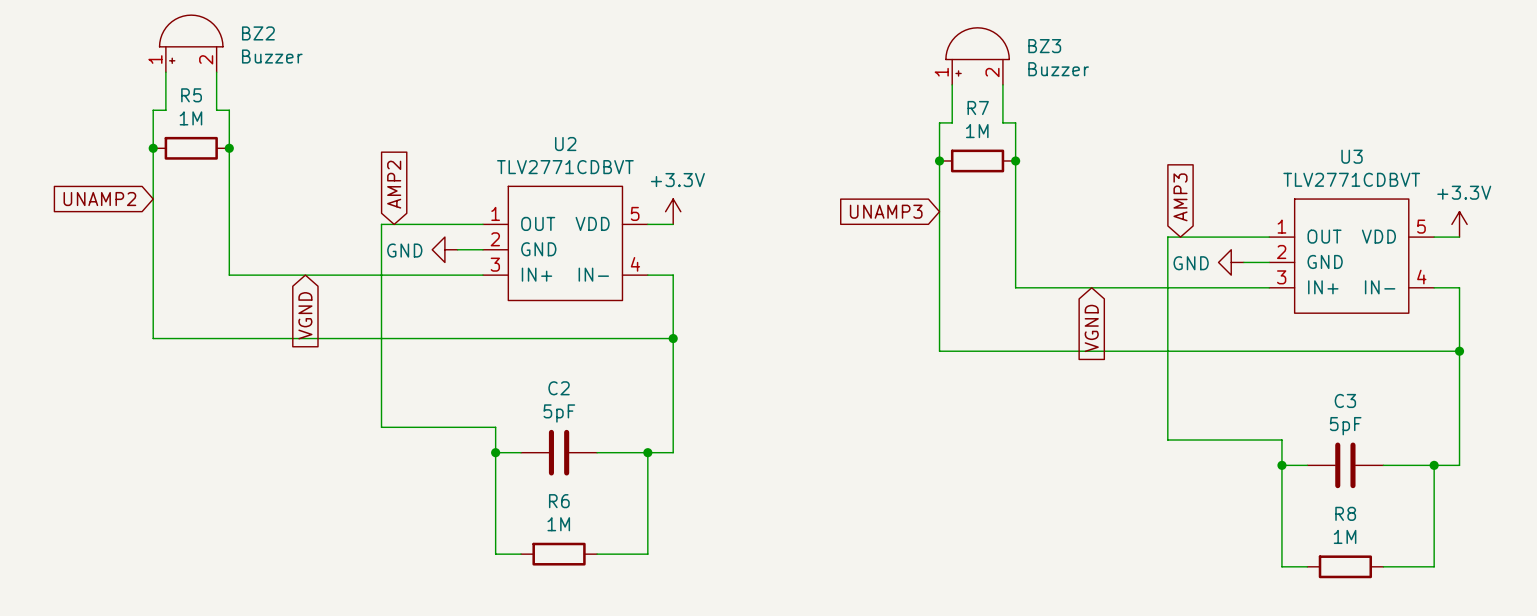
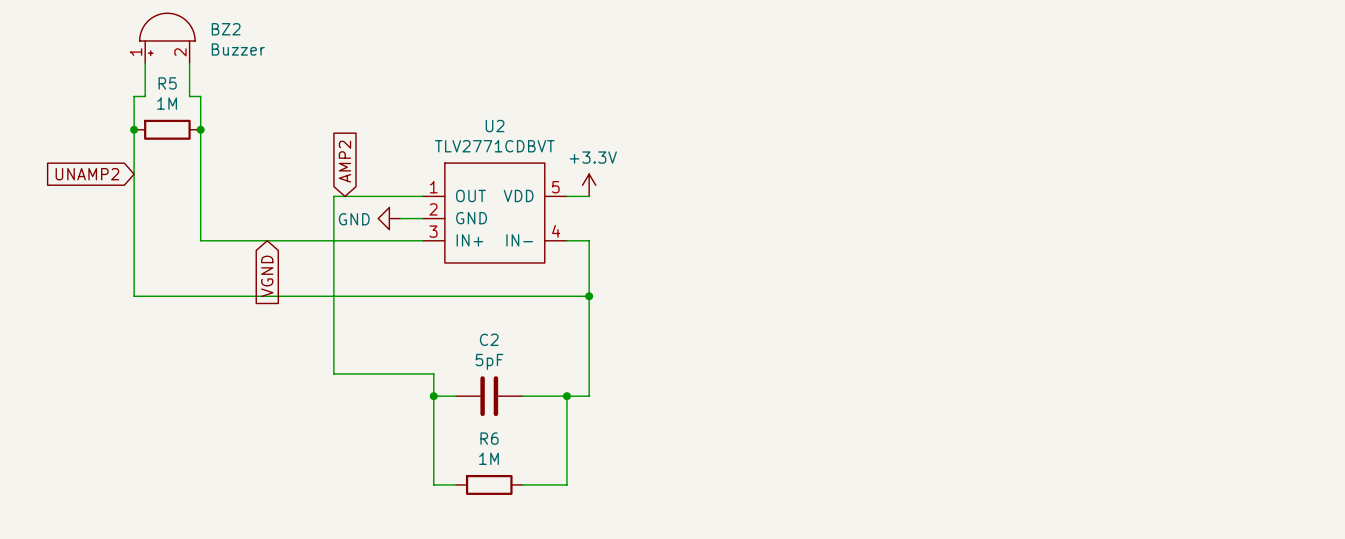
BZ3: Buzzer (977, 56) -> none
wire: (952, 84) (952, 122) (939, 122) (939, 351) (1459, 351) -> none
wire: (1002, 84) (1002, 122) (1015, 122) (1015, 287) (1269, 287) -> none
junction: (939, 160) -> none
R7: 1M (977, 160) -> none
junction: (1015, 160) -> none
global label: AMP3 (1180, 197) -> none
global label: UNAMP3 (886, 211) -> none
power symbol: +3.3V (1459, 224) -> none
wire: (1269, 237) (1167, 237) (1167, 440) (1281, 440) (1281, 566) (1307, 566) -> none
wire: (1434, 237) (1459, 237) -> none
U3: TLV2771CDBVT (1351, 256) -> none
power symbol: GND (1231, 262) -> none
wire: (1243, 262) (1269, 262) -> none
wire: (1434, 287) (1459, 287) (1459, 465) (1383, 465) -> none
global label: VGND (1091, 328) -> none
junction: (1459, 351) -> none
wire: (1281, 465) (1307, 465) -> none
junction: (1281, 465) -> none
C3: 5pF (1345, 465) -> none
wire: (1434, 465) (1434, 566) (1383, 566) -> none
junction: (1434, 465) -> none
R8: 1M (1345, 566) -> none

